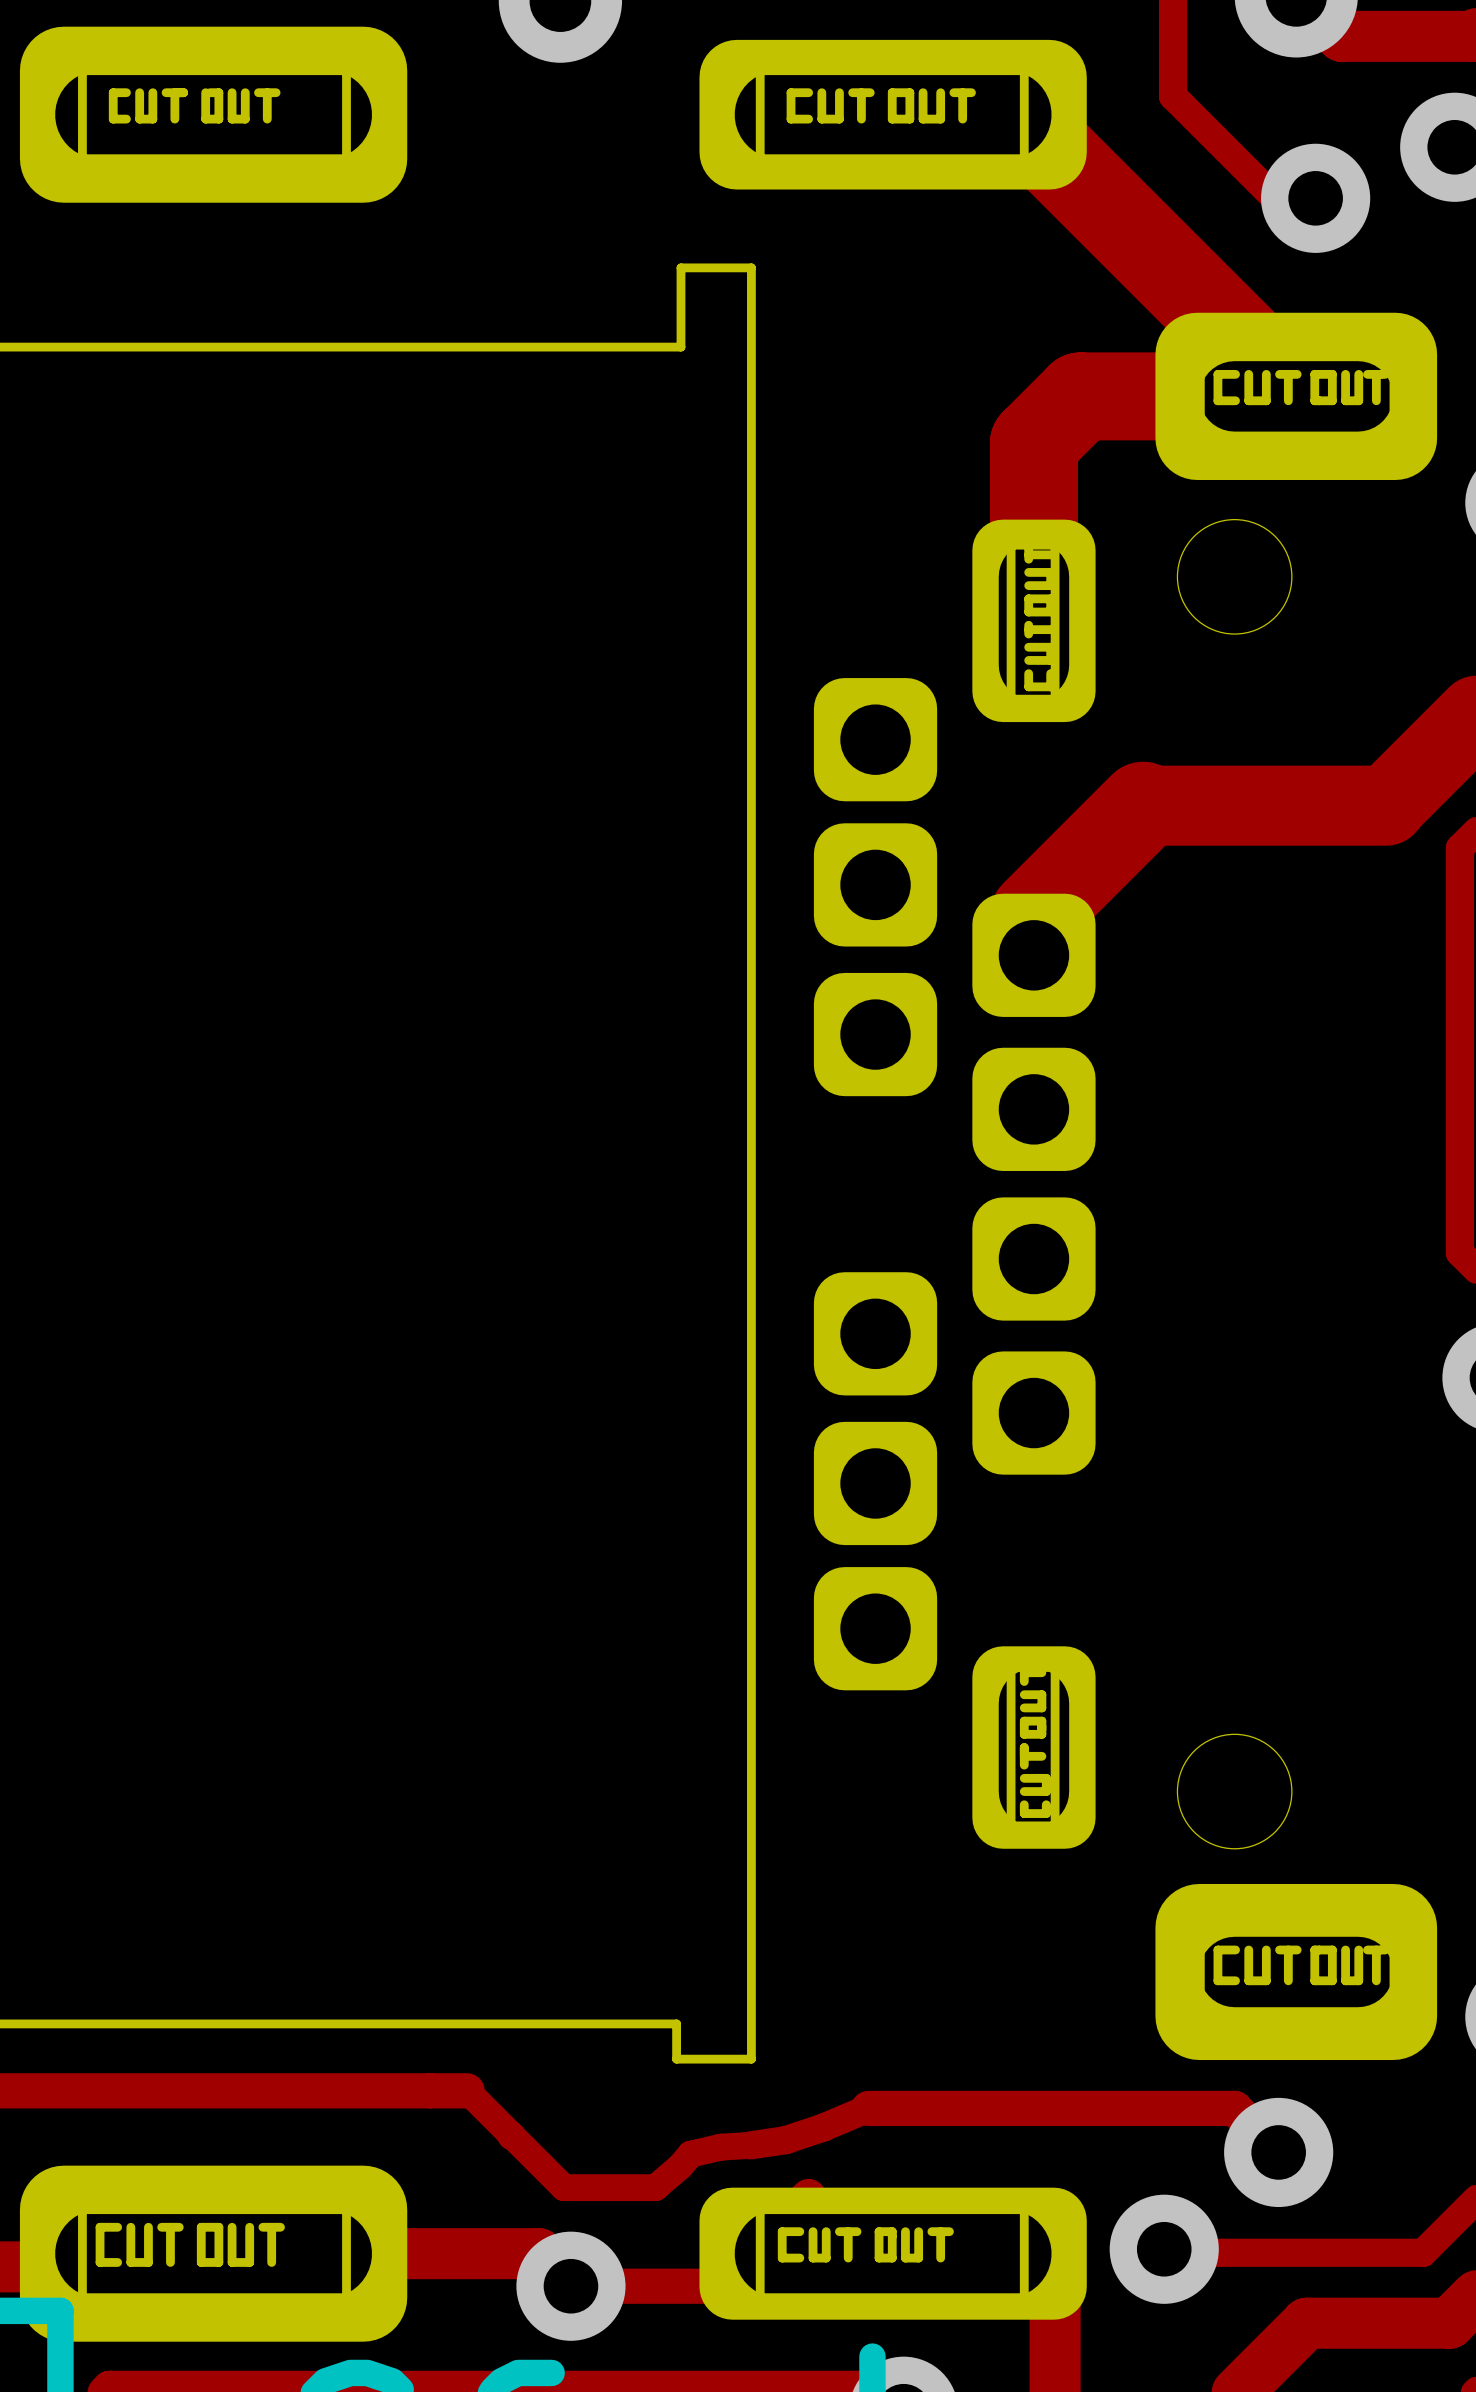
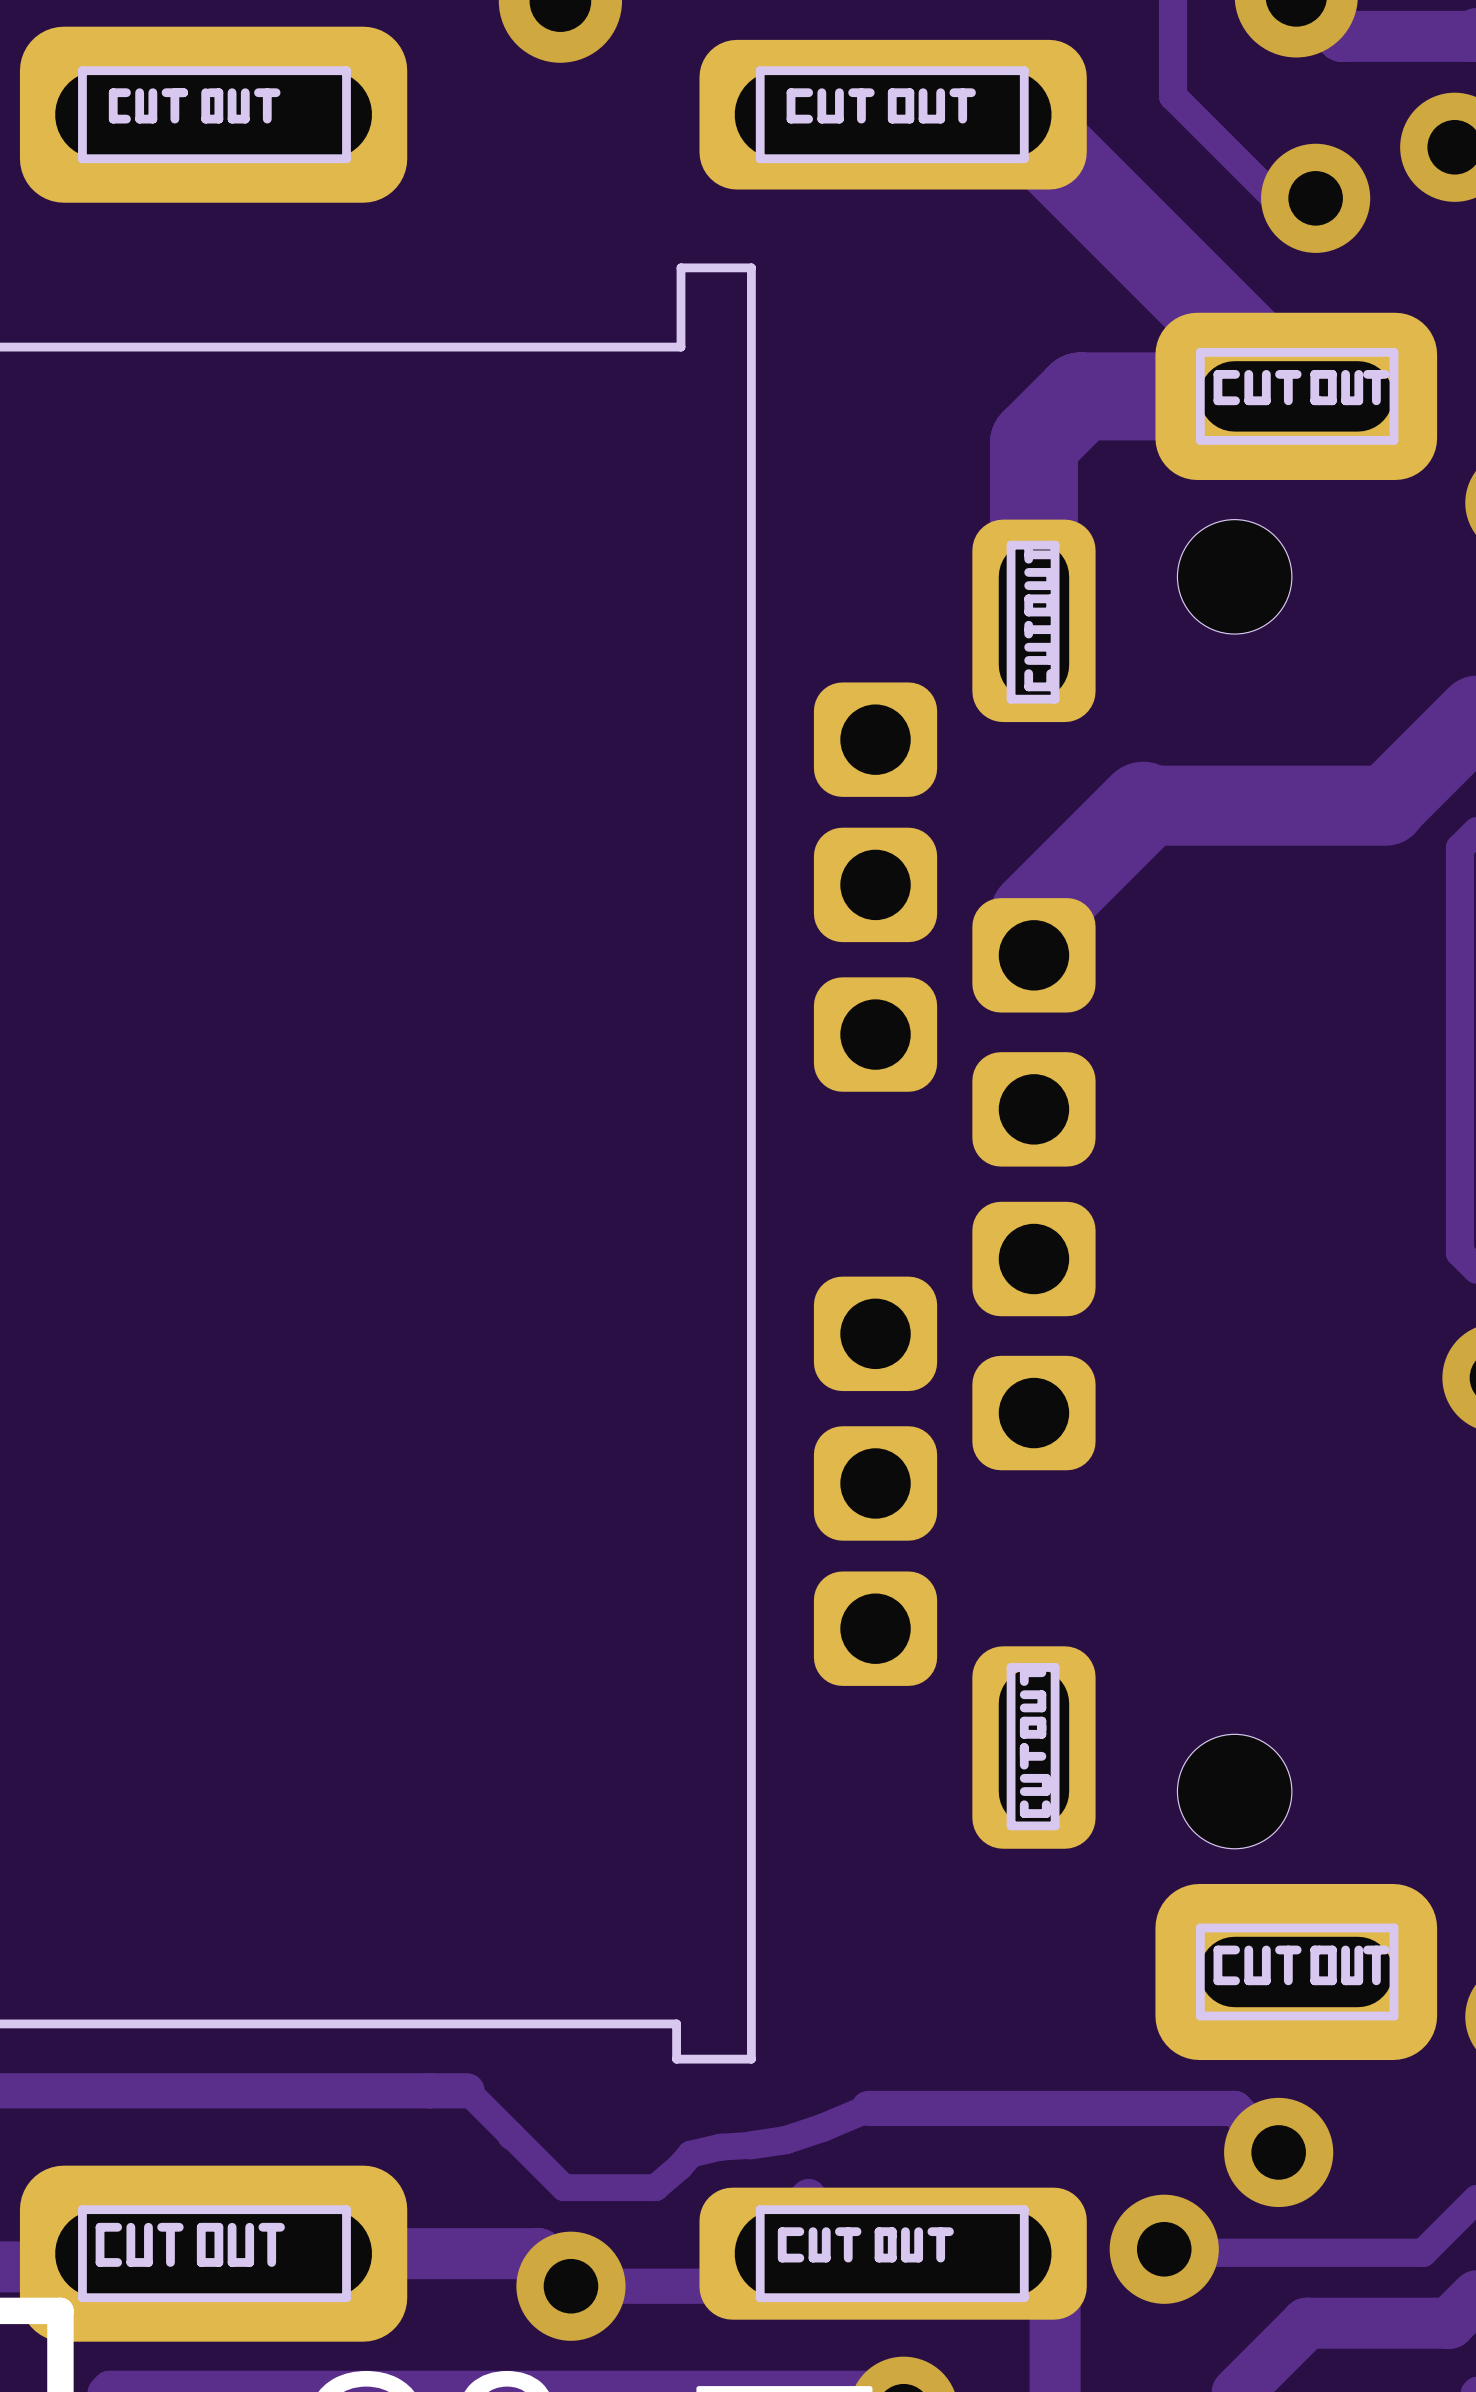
part footprint: [19, 26, 1438, 2342] -> [19, 26, 1438, 2342]

